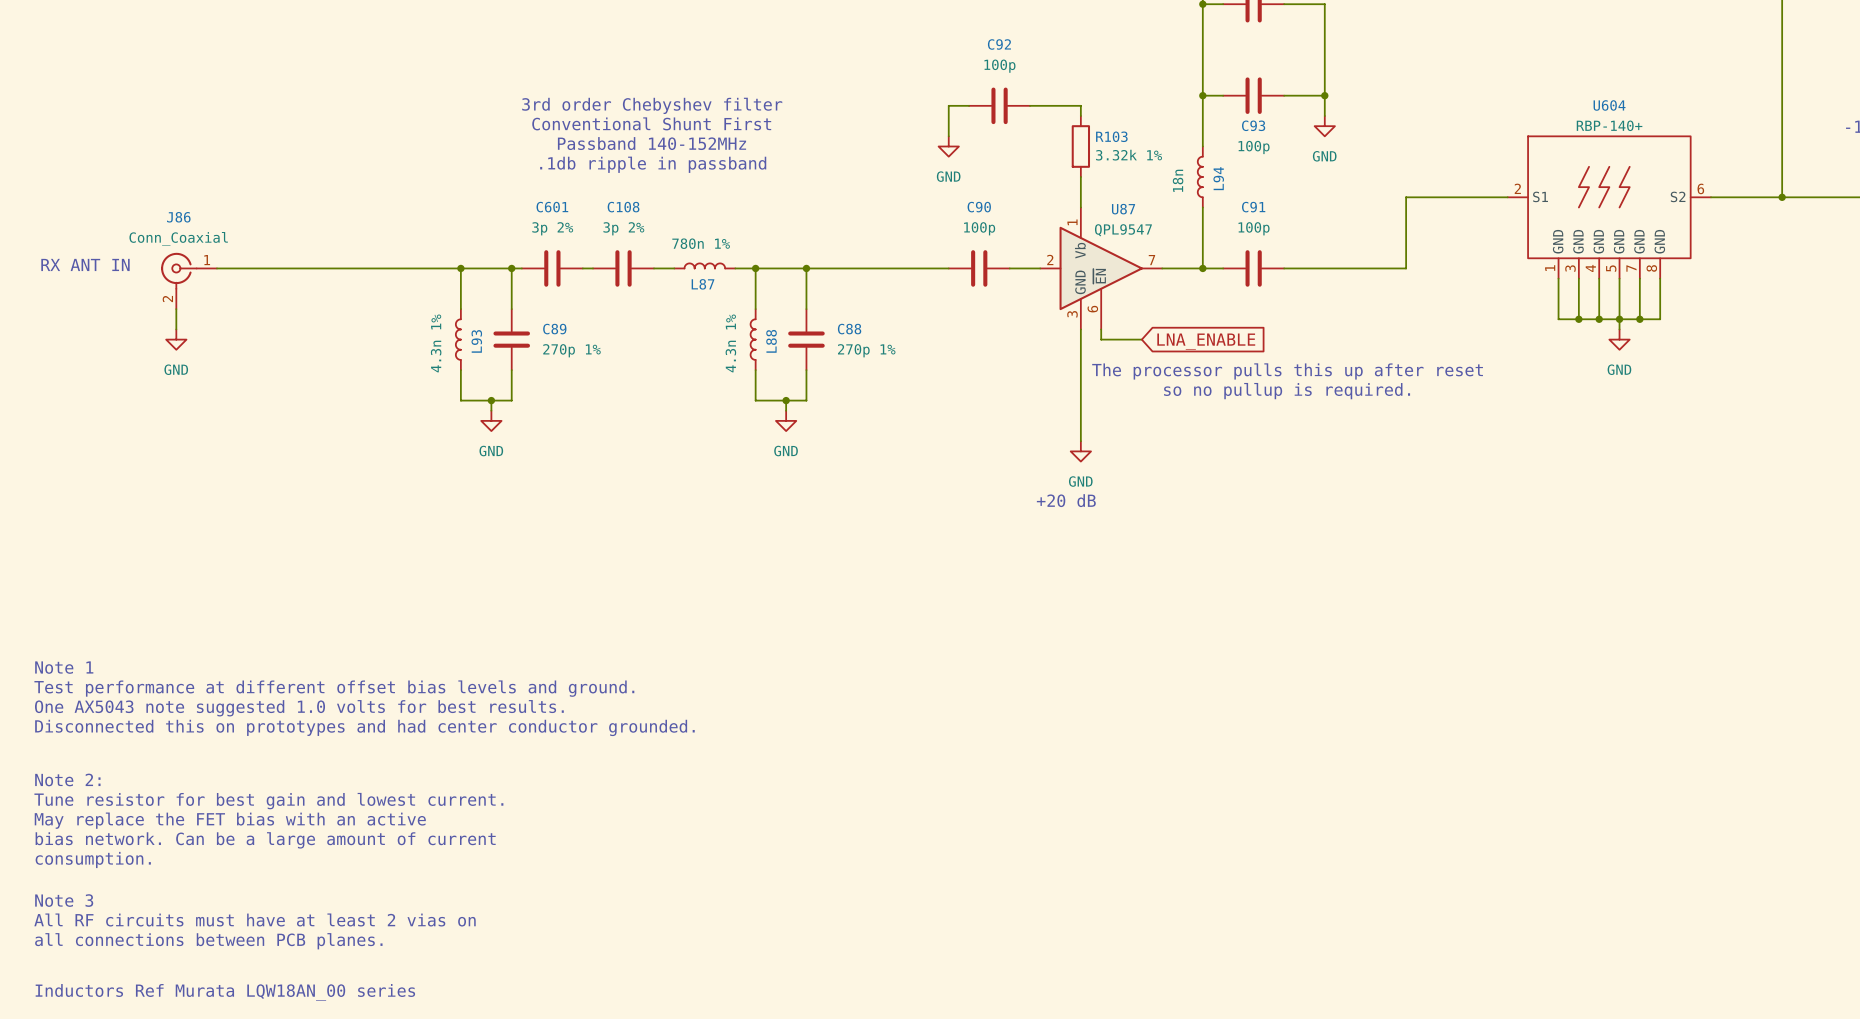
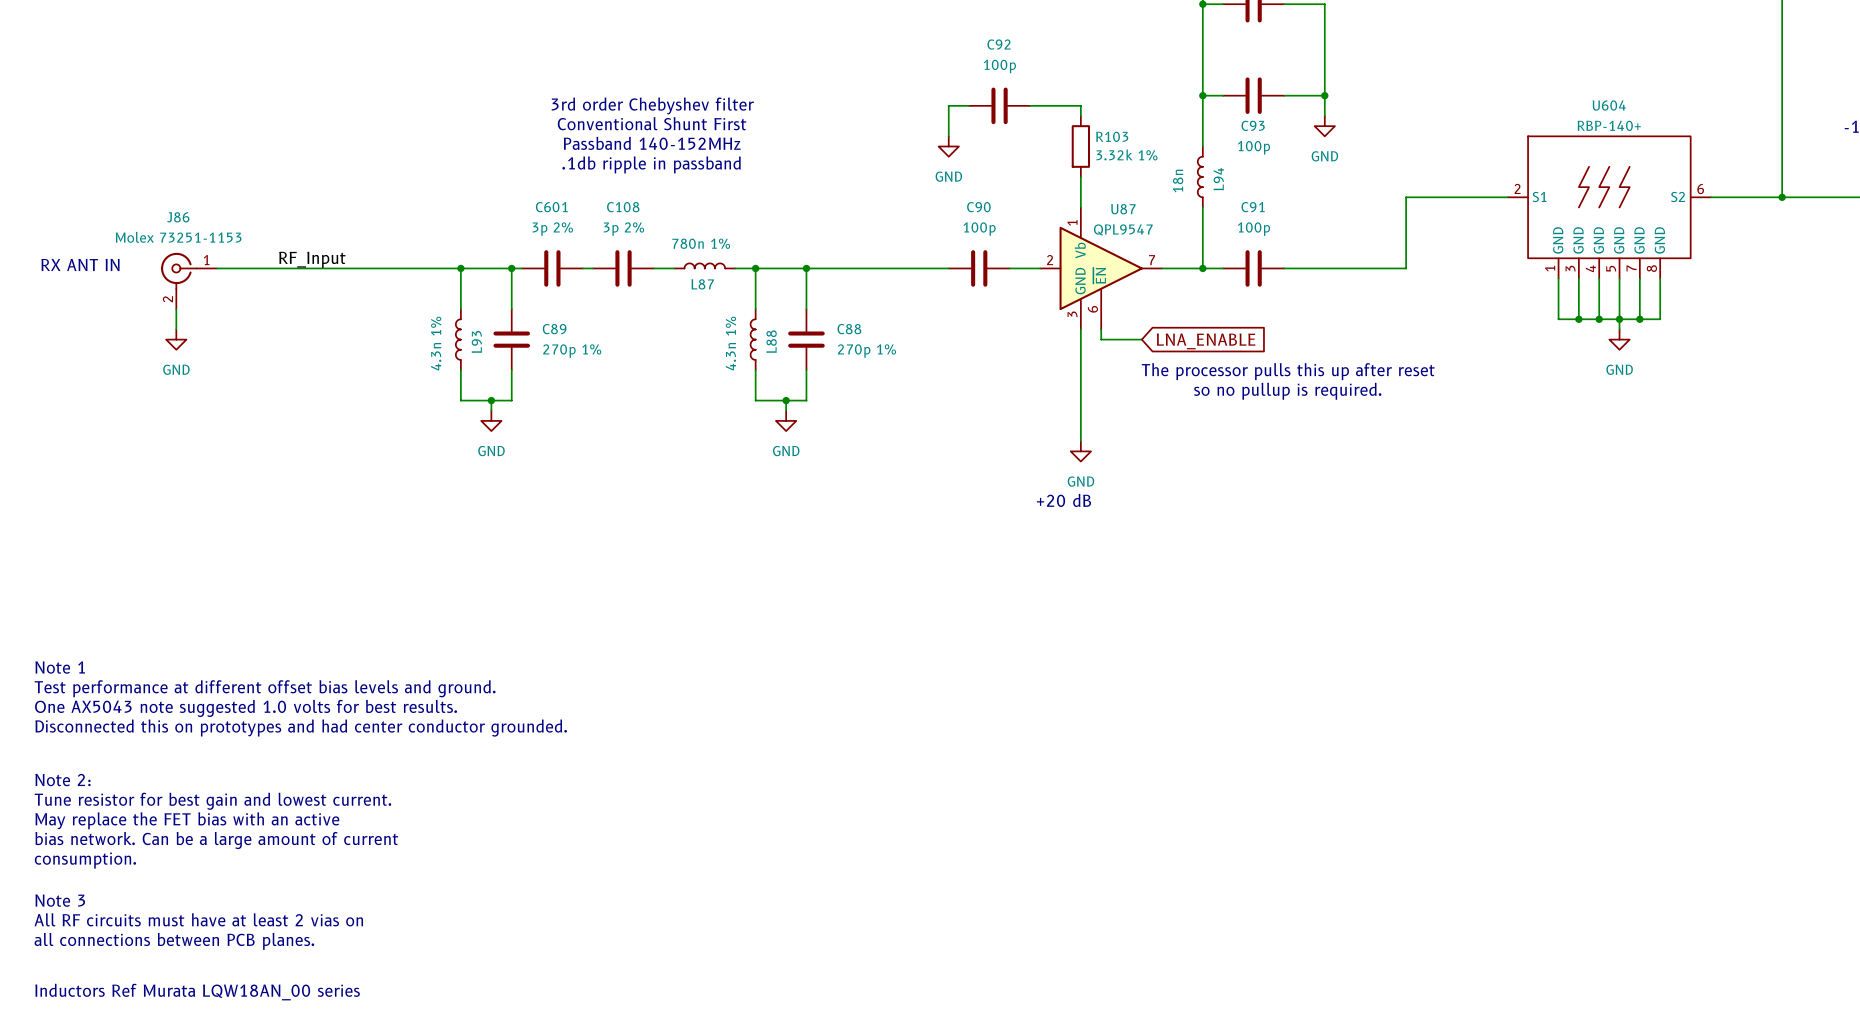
J86 value: Conn_Coaxial (178, 238) -> Molex 73251-1153 (178, 237)
label: none -> RF_Input (312, 259)

